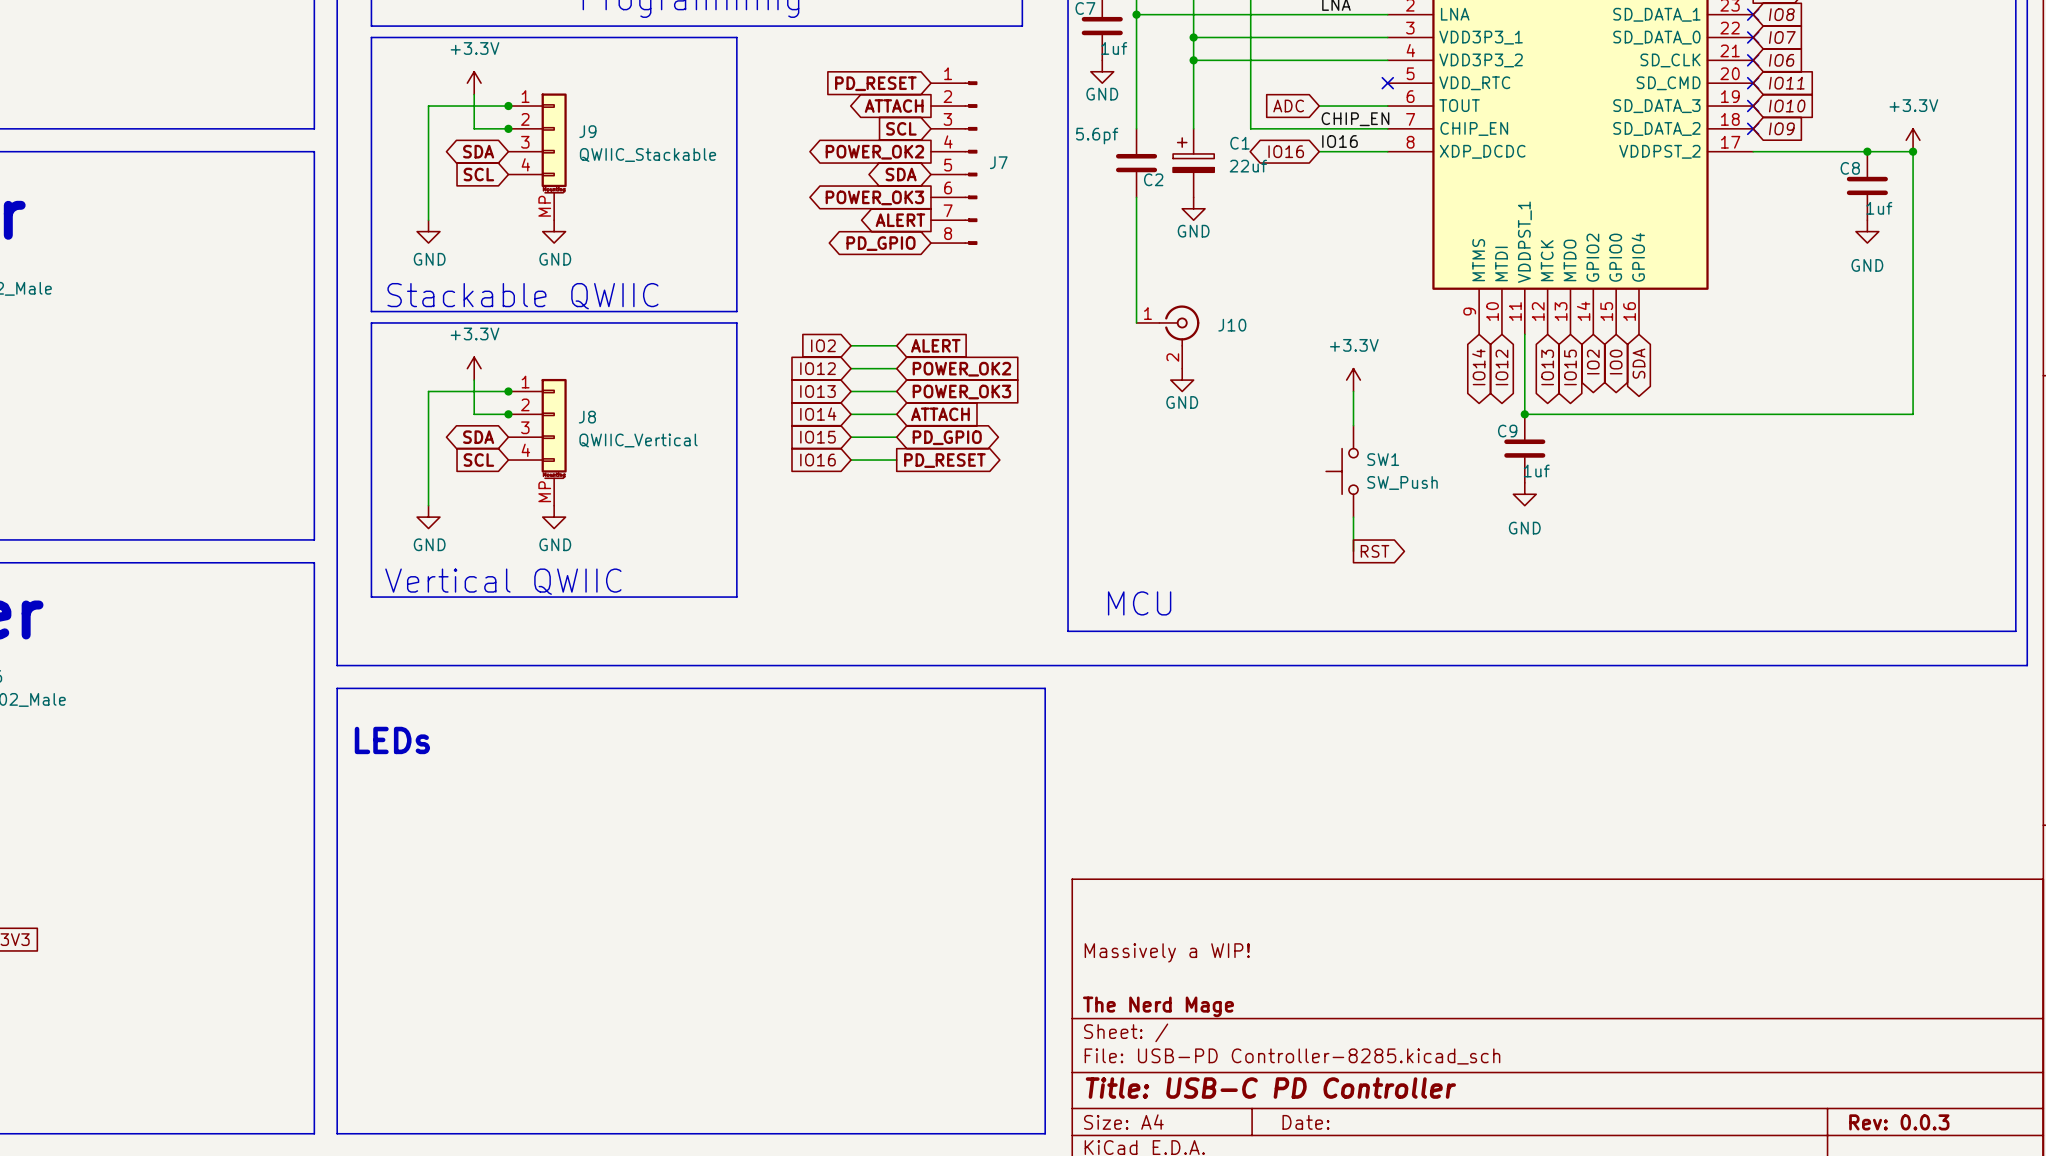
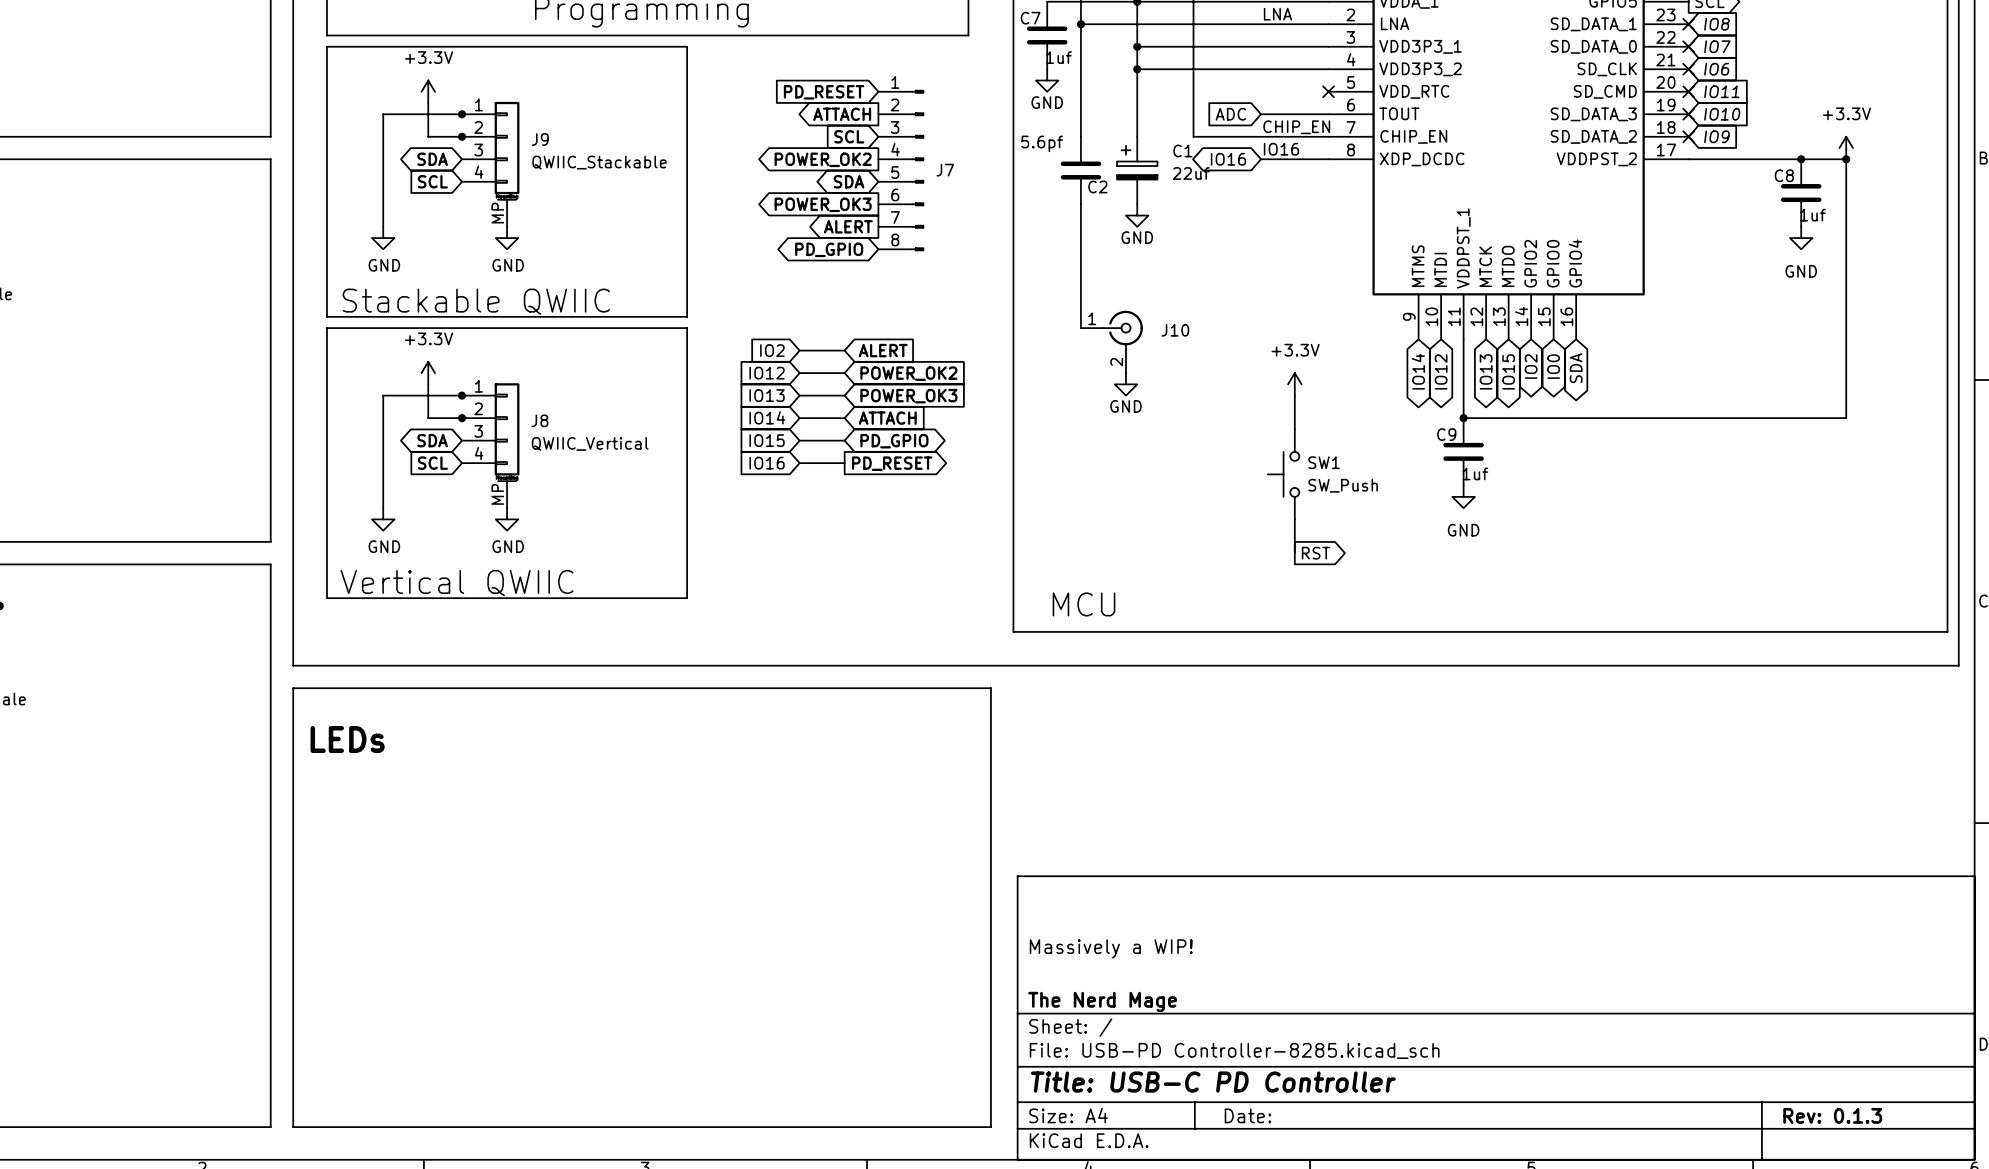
title block: Rev: 0.0.3 (1899, 1122) -> Rev: 0.1.3 (1832, 1115)

